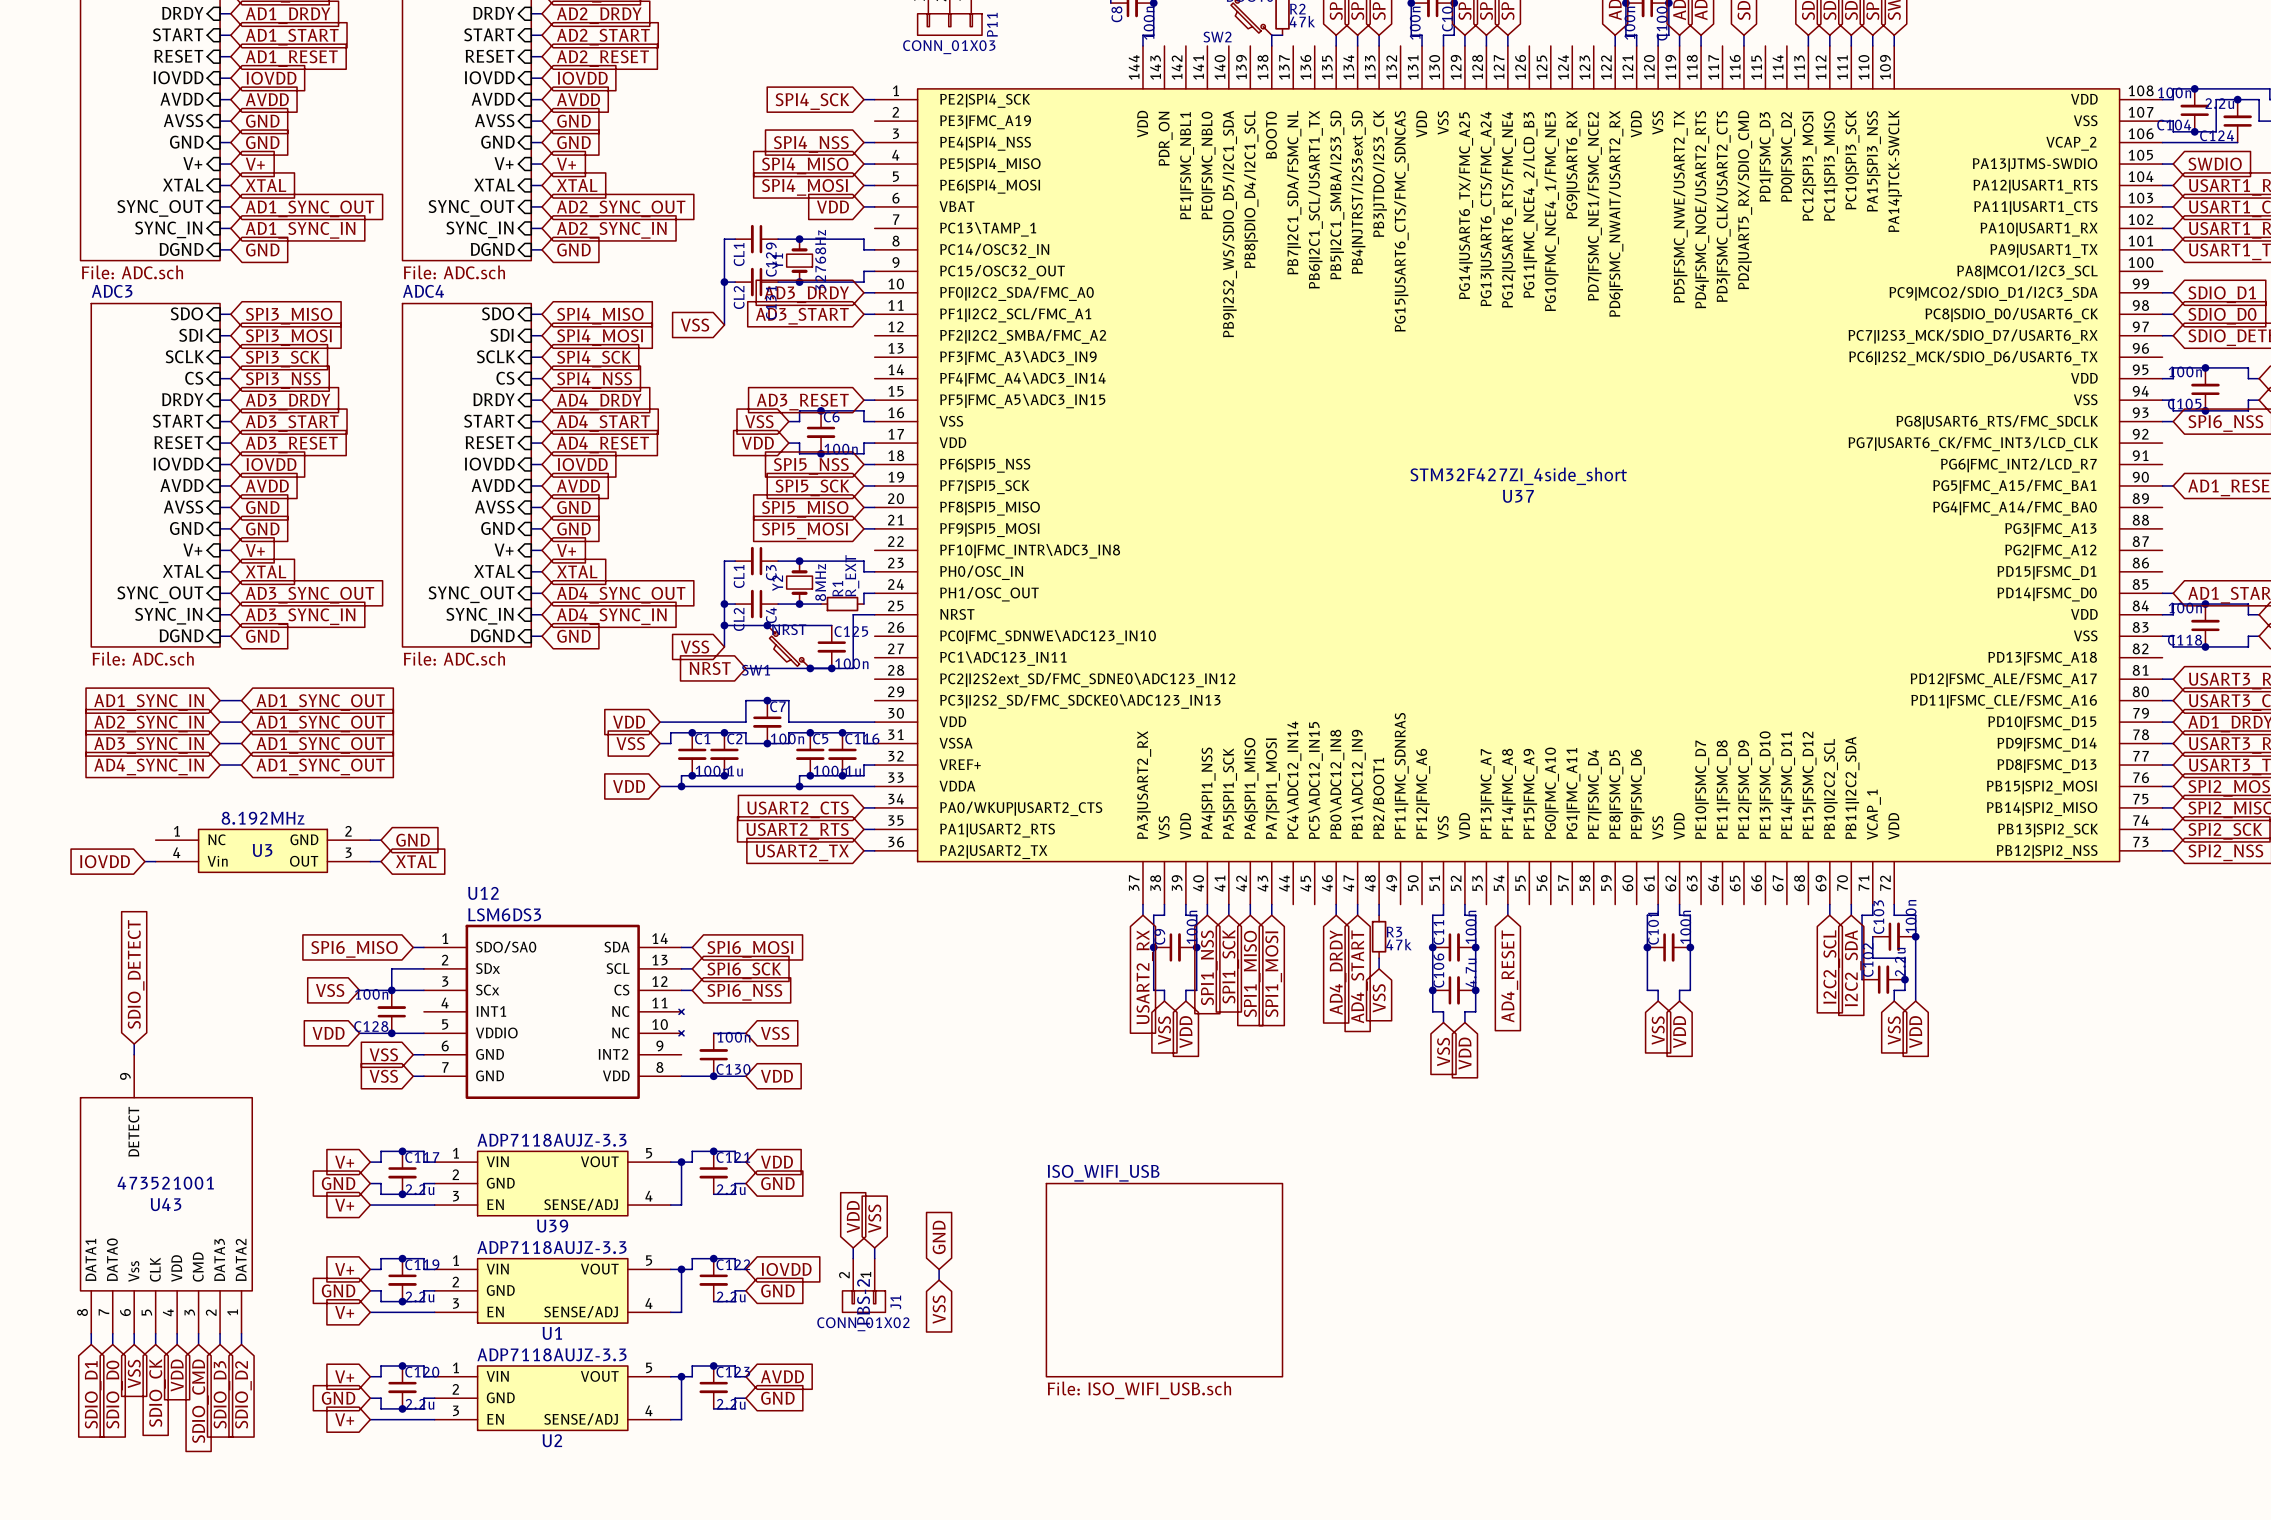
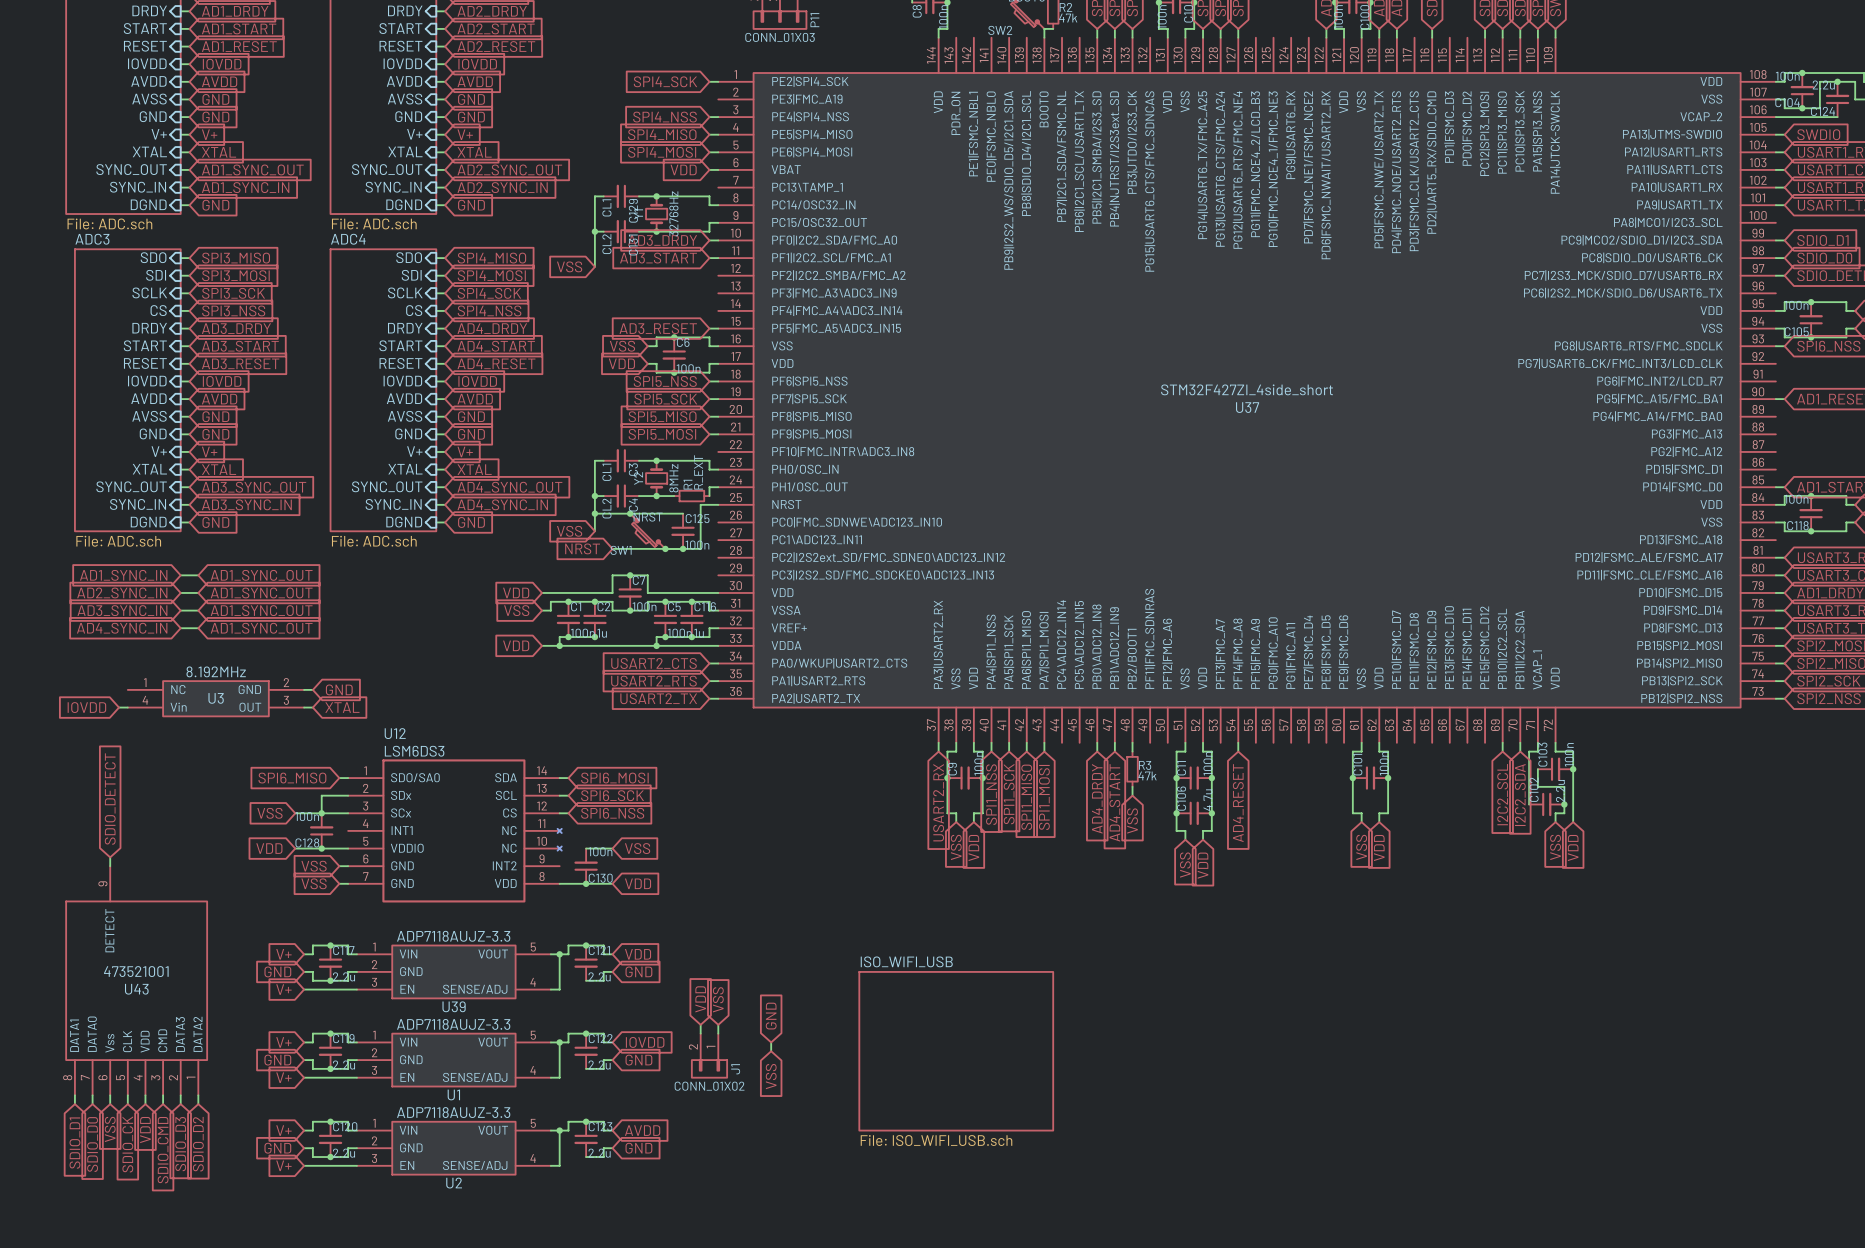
J1 text: PBS-2 (863, 1301) -> none

